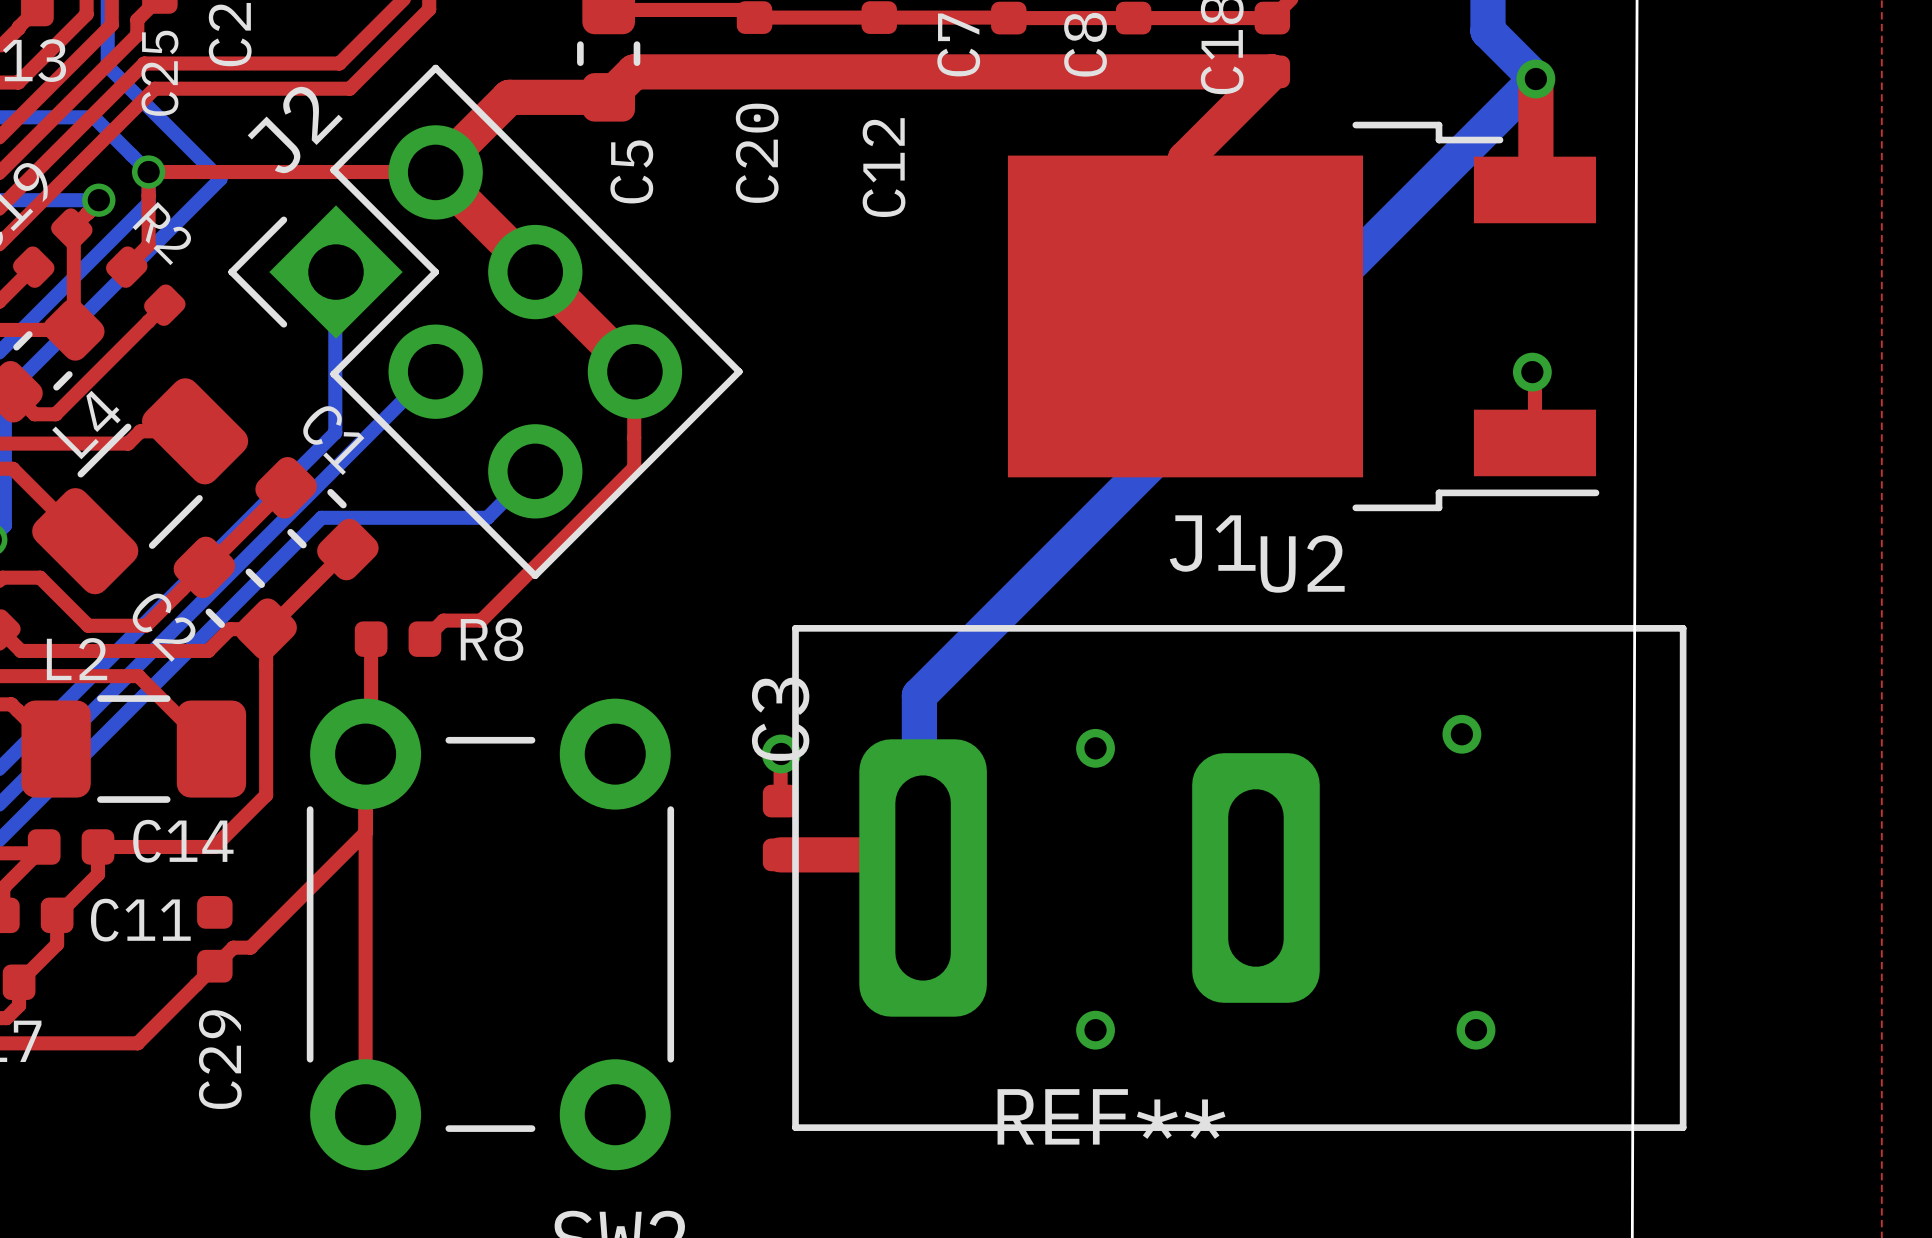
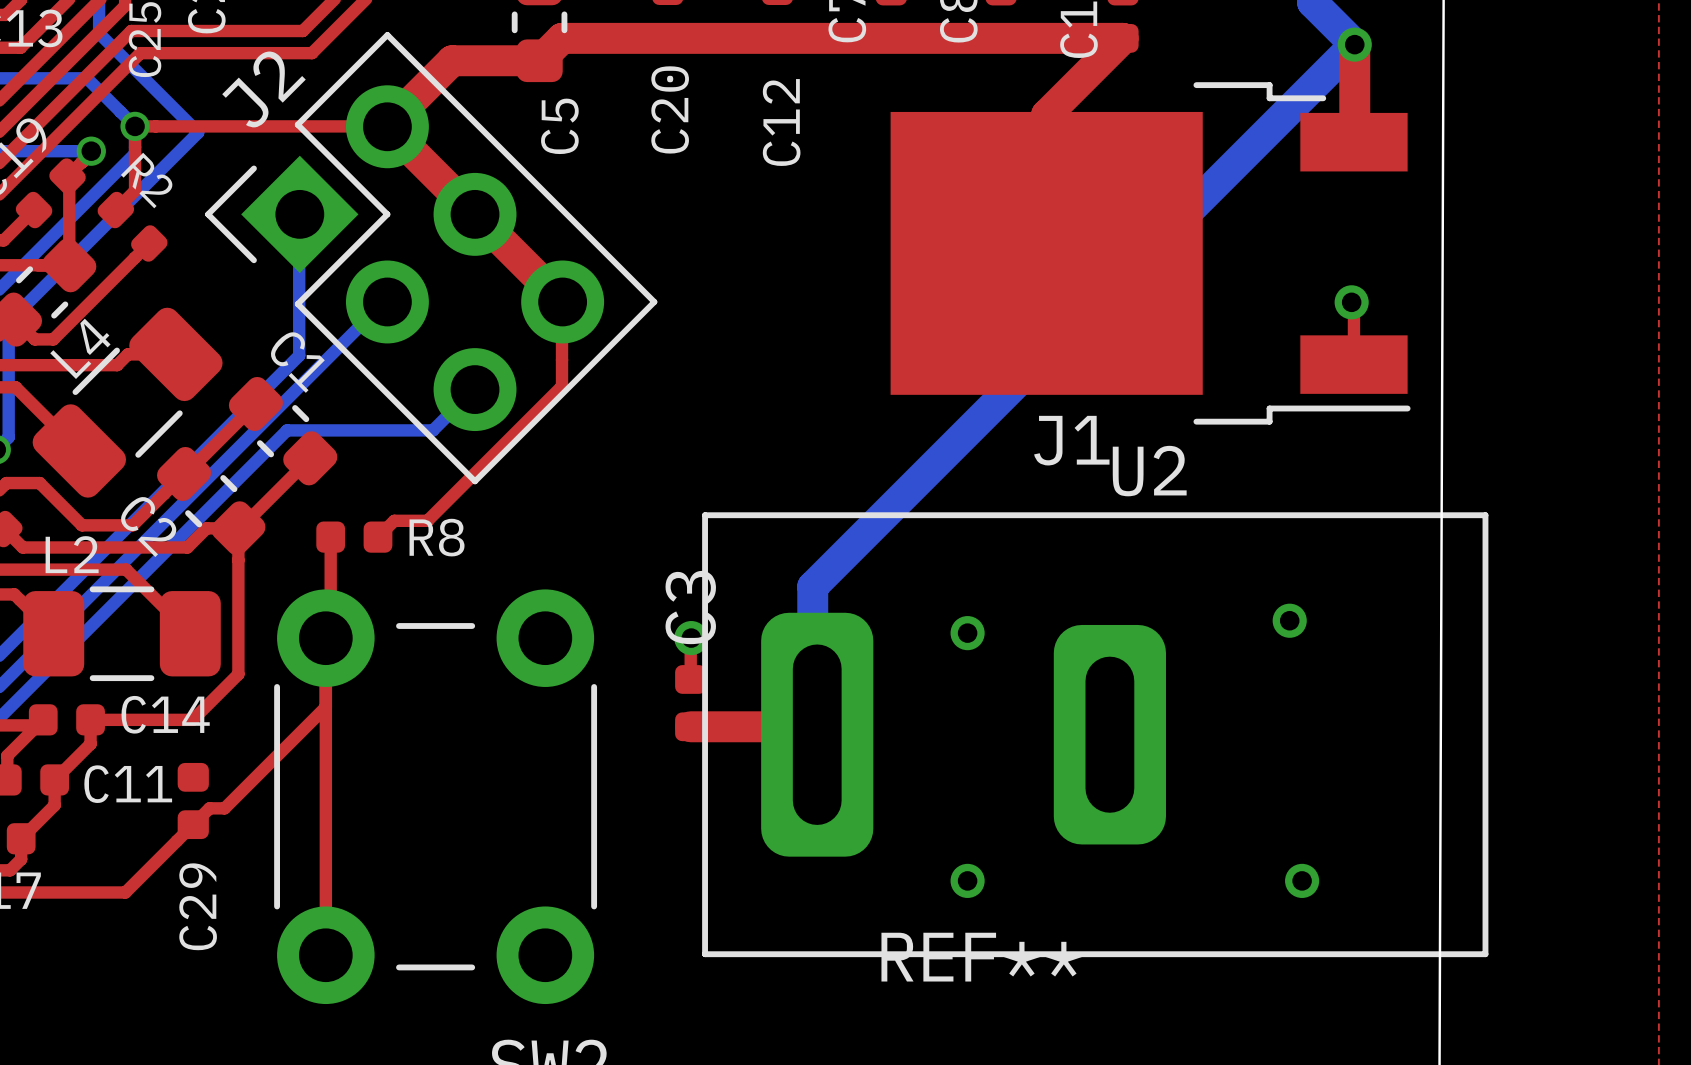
J1 position: (1239, 877) -> (1095, 734)

